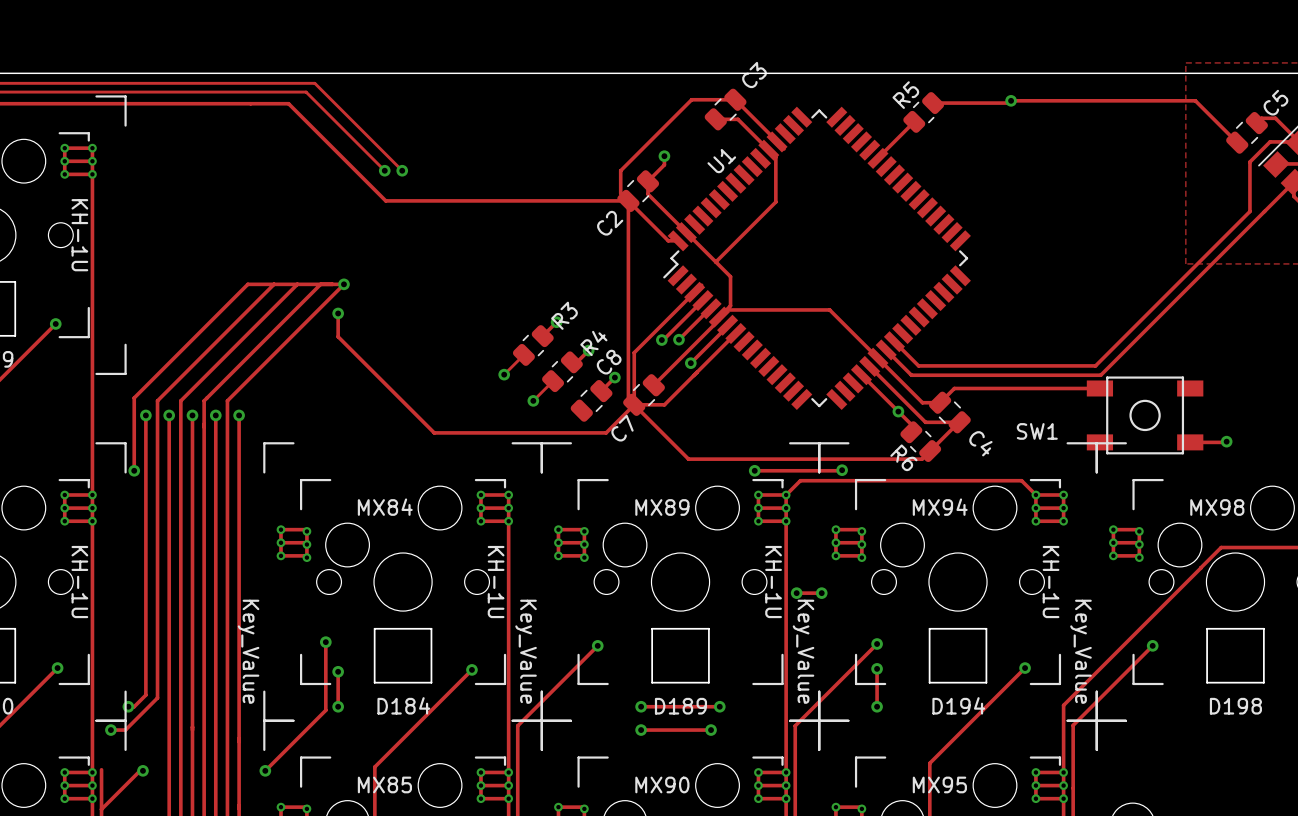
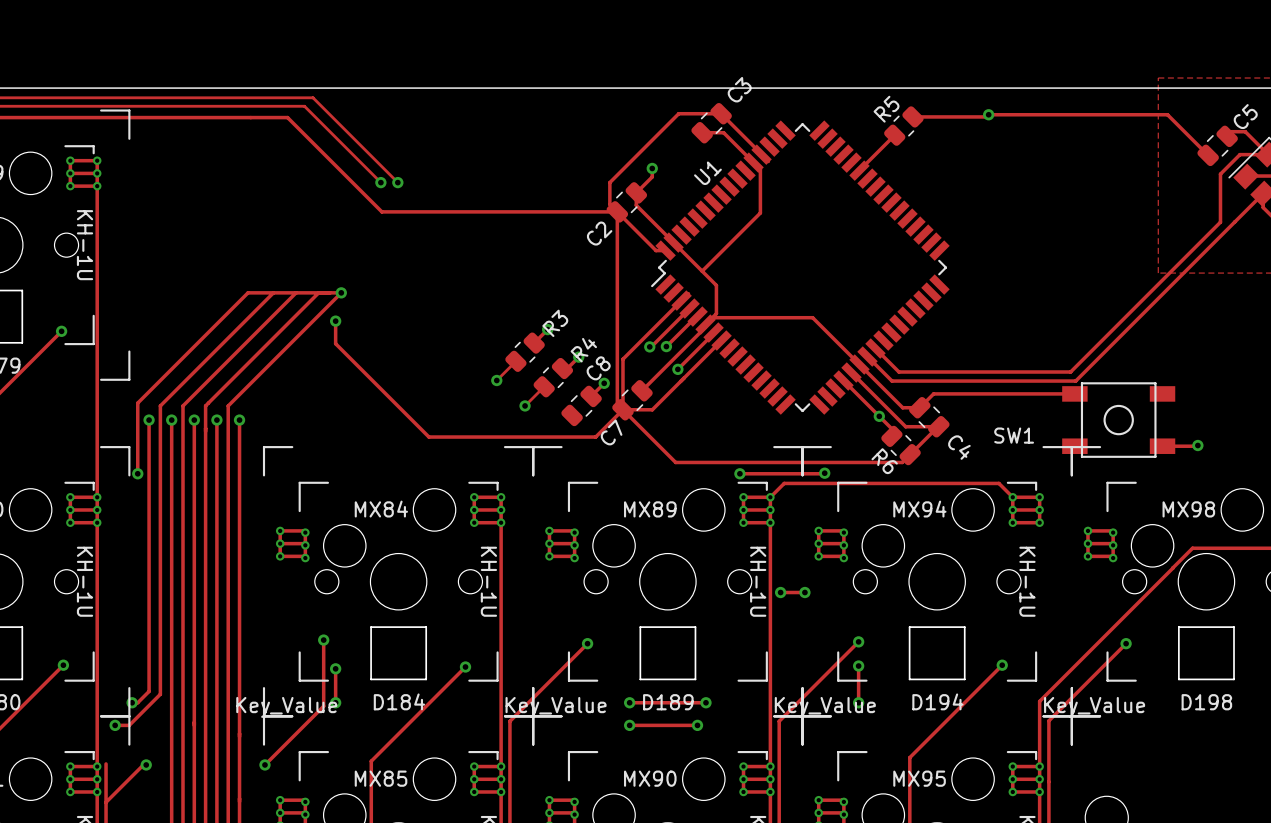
part position: (248, 651) -> (286, 707)
part position: (526, 651) -> (556, 707)
part position: (803, 651) -> (825, 707)
part position: (1080, 651) -> (1094, 707)

